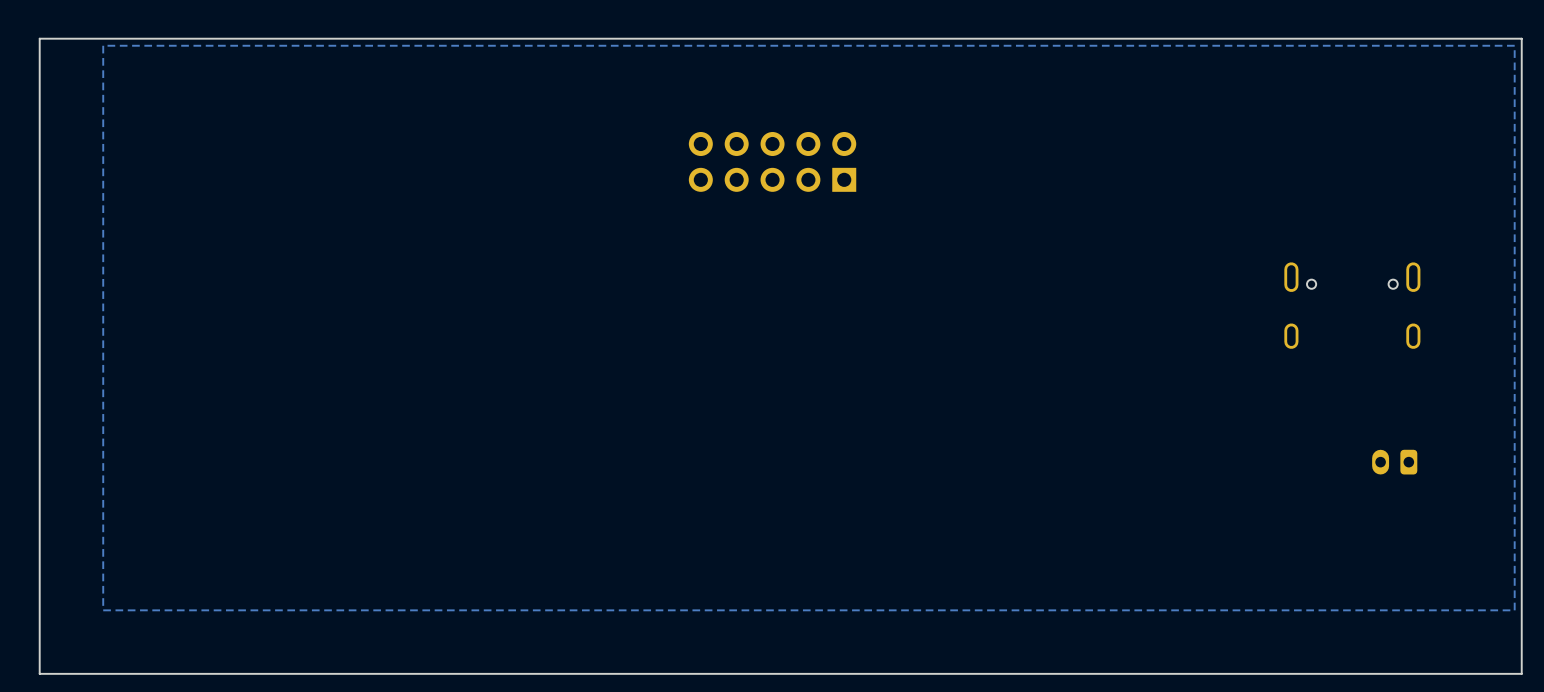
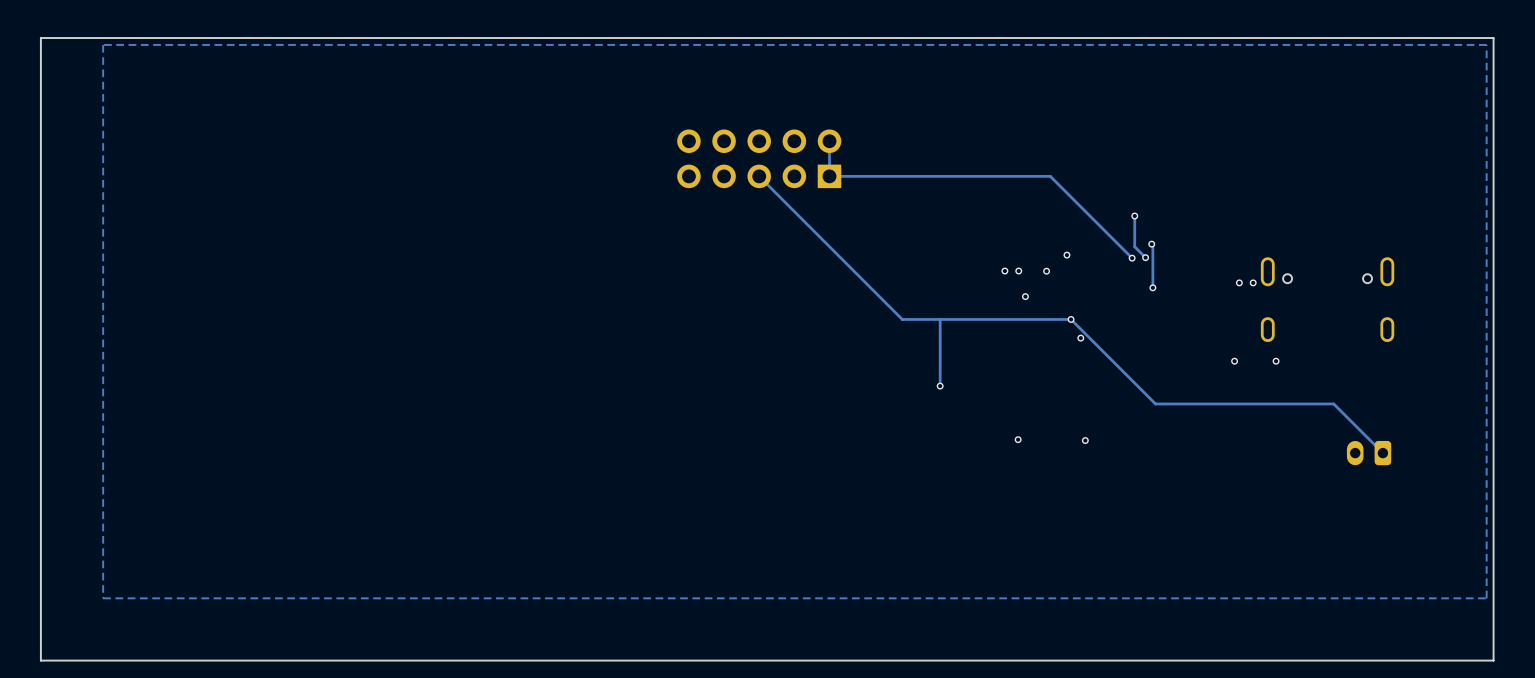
track: none -> (829, 141) (829, 176) (1050, 176) (1132, 258)
track: none -> (759, 176) (902, 319) (1071, 319) (1155, 403) (1333, 403) (1382, 453)
track: none -> (1134, 216) (1134, 246) (1145, 257)
via: none -> (1134, 216)
track: none -> (1151, 244) (1152, 287)
via: none -> (1151, 244)
via: none -> (1066, 255)
via: none -> (1145, 257)
via: none -> (1132, 258)
via: none -> (1004, 271)
via: none -> (1018, 271)
via: none -> (1046, 271)
via: none -> (1239, 282)
via: none -> (1253, 282)
via: none -> (1152, 287)
via: none -> (1025, 296)
track: none -> (940, 319) (940, 386)
via: none -> (1071, 319)
via: none -> (1080, 338)
via: none -> (1234, 361)
via: none -> (1276, 361)
via: none -> (940, 386)
via: none -> (1018, 439)
via: none -> (1085, 440)

